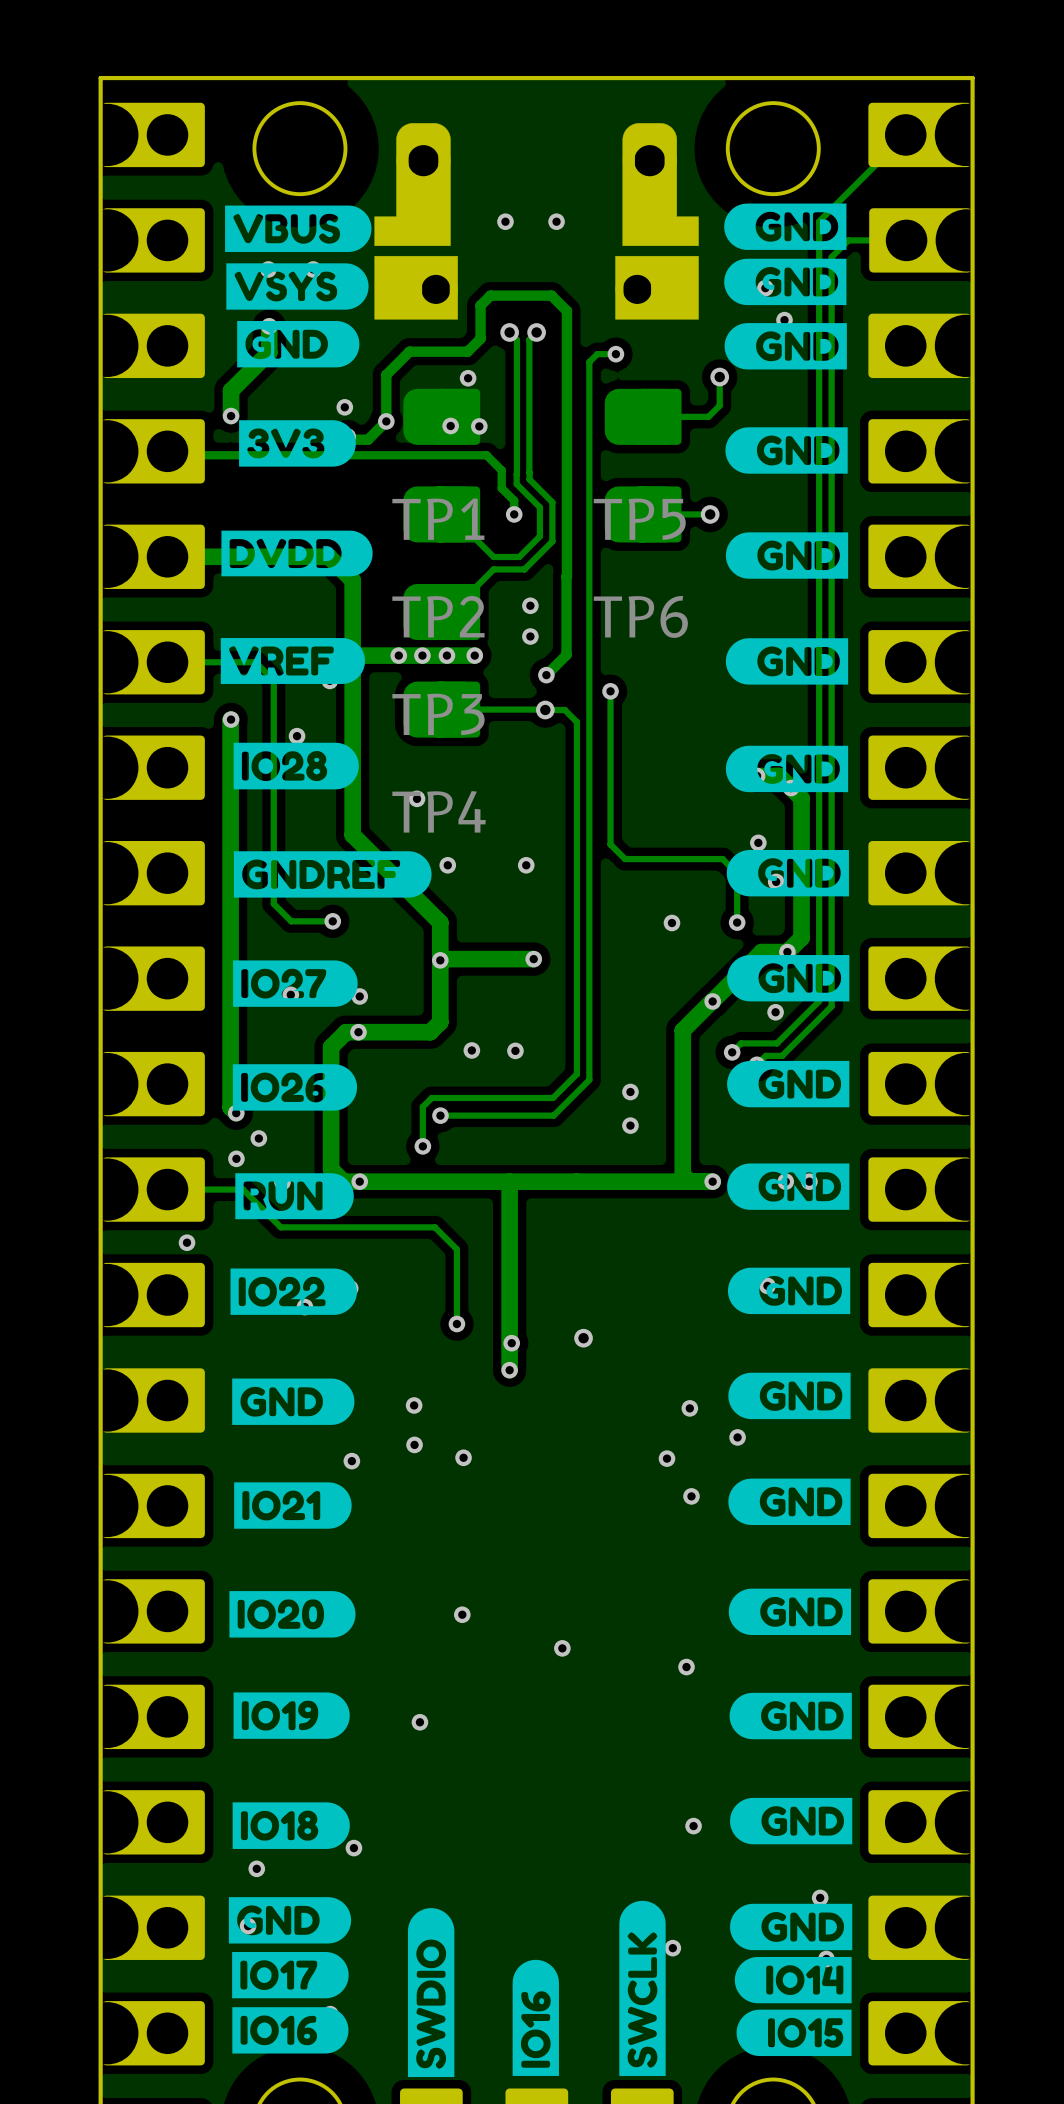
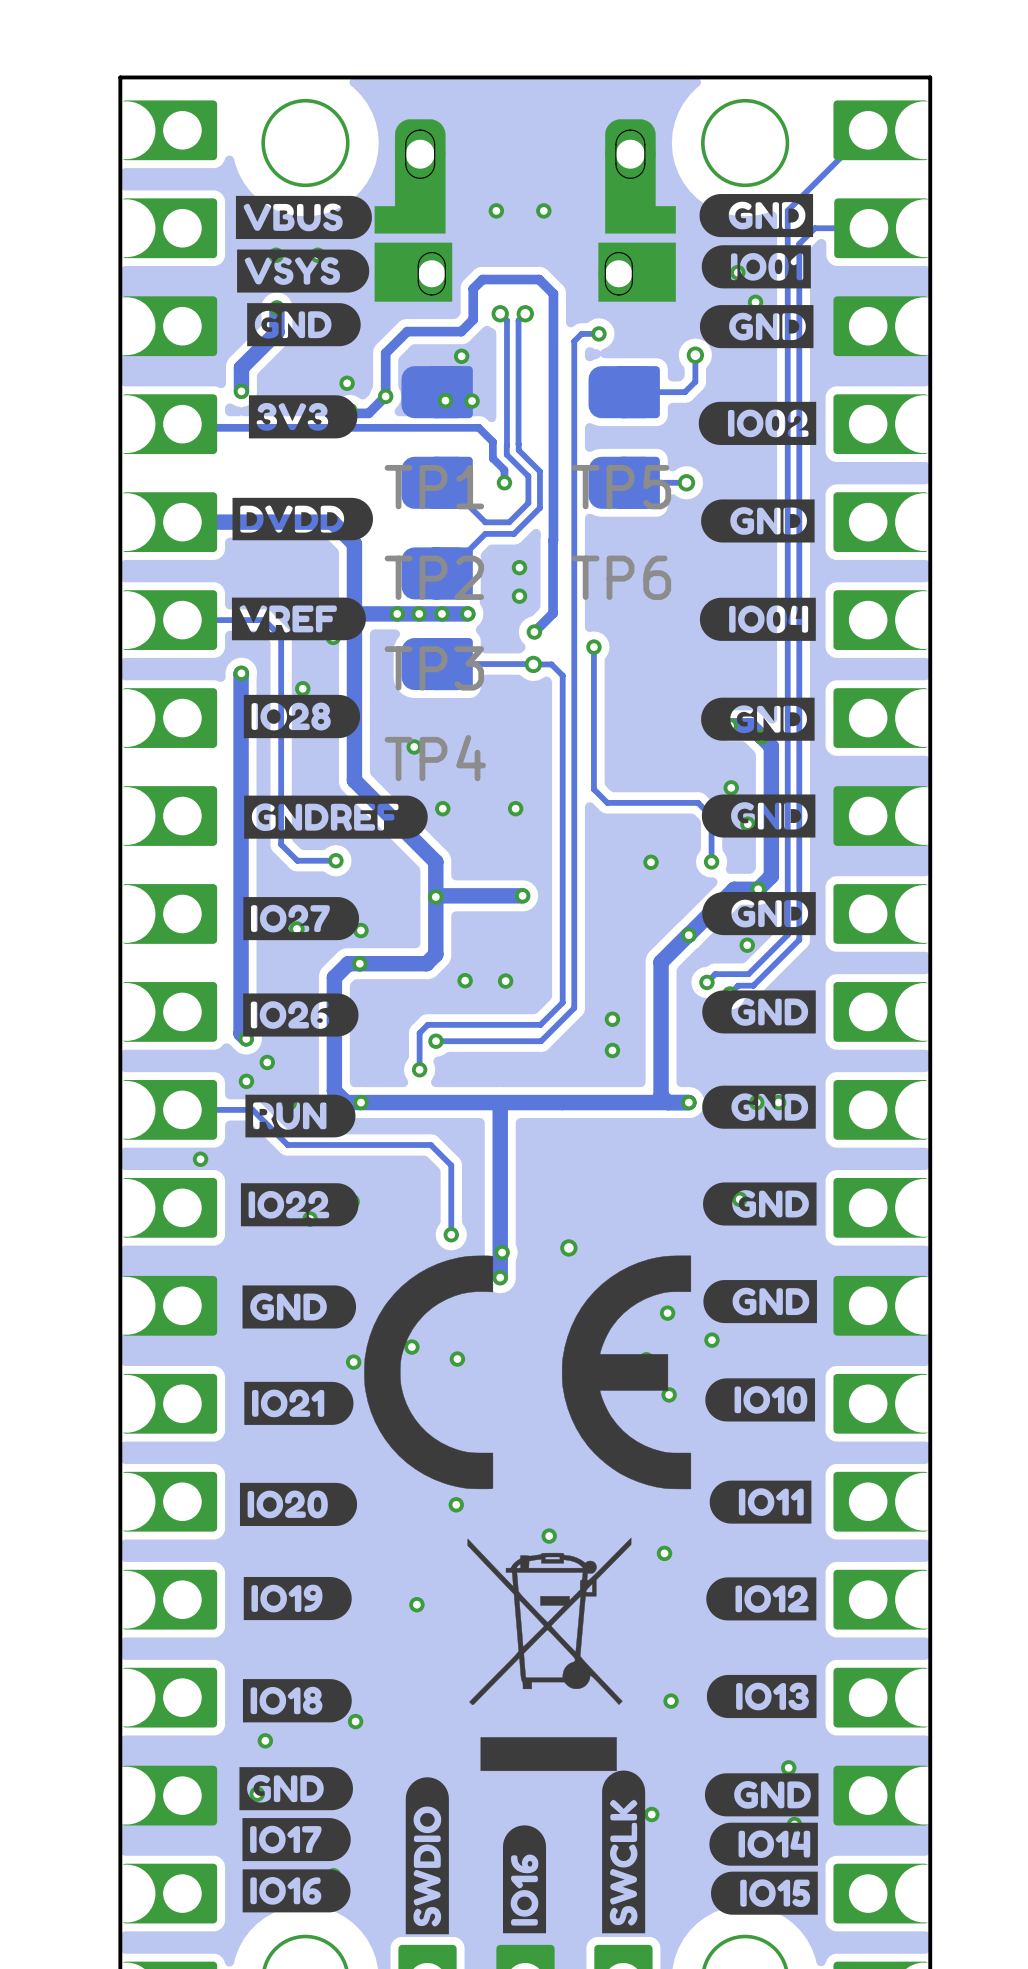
drawing shape: [724, 258, 847, 306] -> [701, 245, 811, 289]
drawing shape: [725, 427, 848, 474] -> [698, 401, 817, 445]
drawing shape: [725, 638, 849, 685] -> [699, 597, 816, 641]
drawing: none -> [364, 1255, 692, 1490]
drawing shape: [728, 1478, 851, 1525] -> [705, 1378, 816, 1422]
drawing shape: [728, 1588, 852, 1636] -> [709, 1480, 812, 1524]
drawing: none -> [467, 1537, 632, 1772]
drawing shape: [729, 1692, 852, 1740] -> [706, 1577, 817, 1621]
drawing shape: [730, 1797, 853, 1845] -> [706, 1674, 817, 1719]

